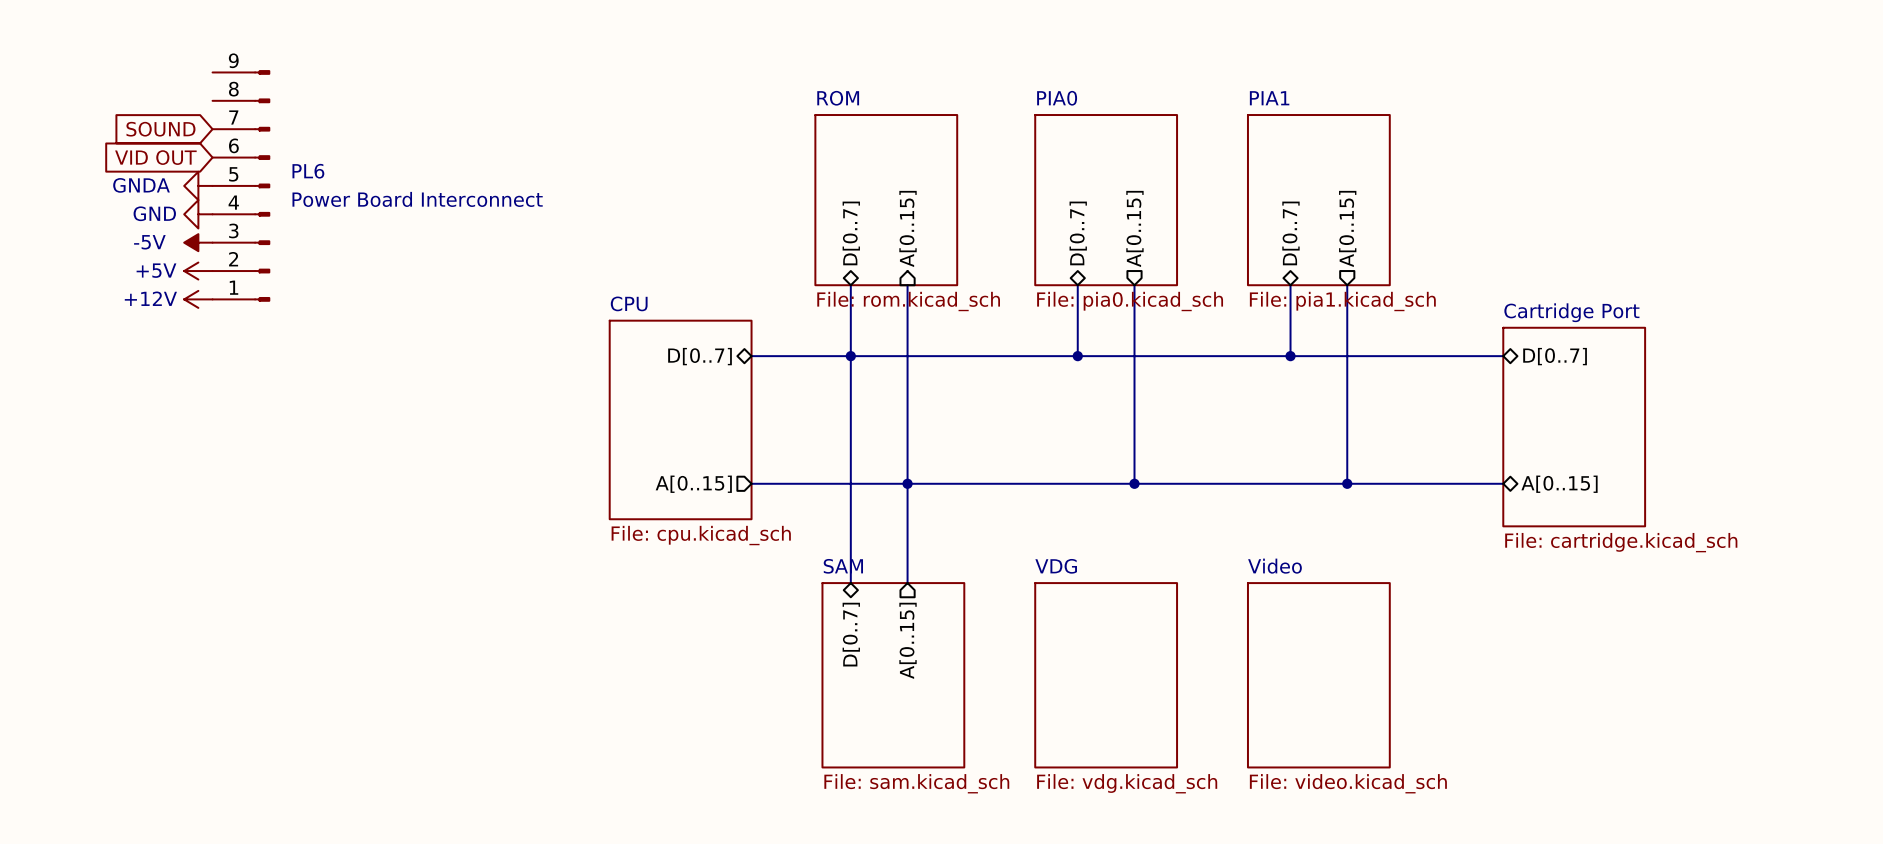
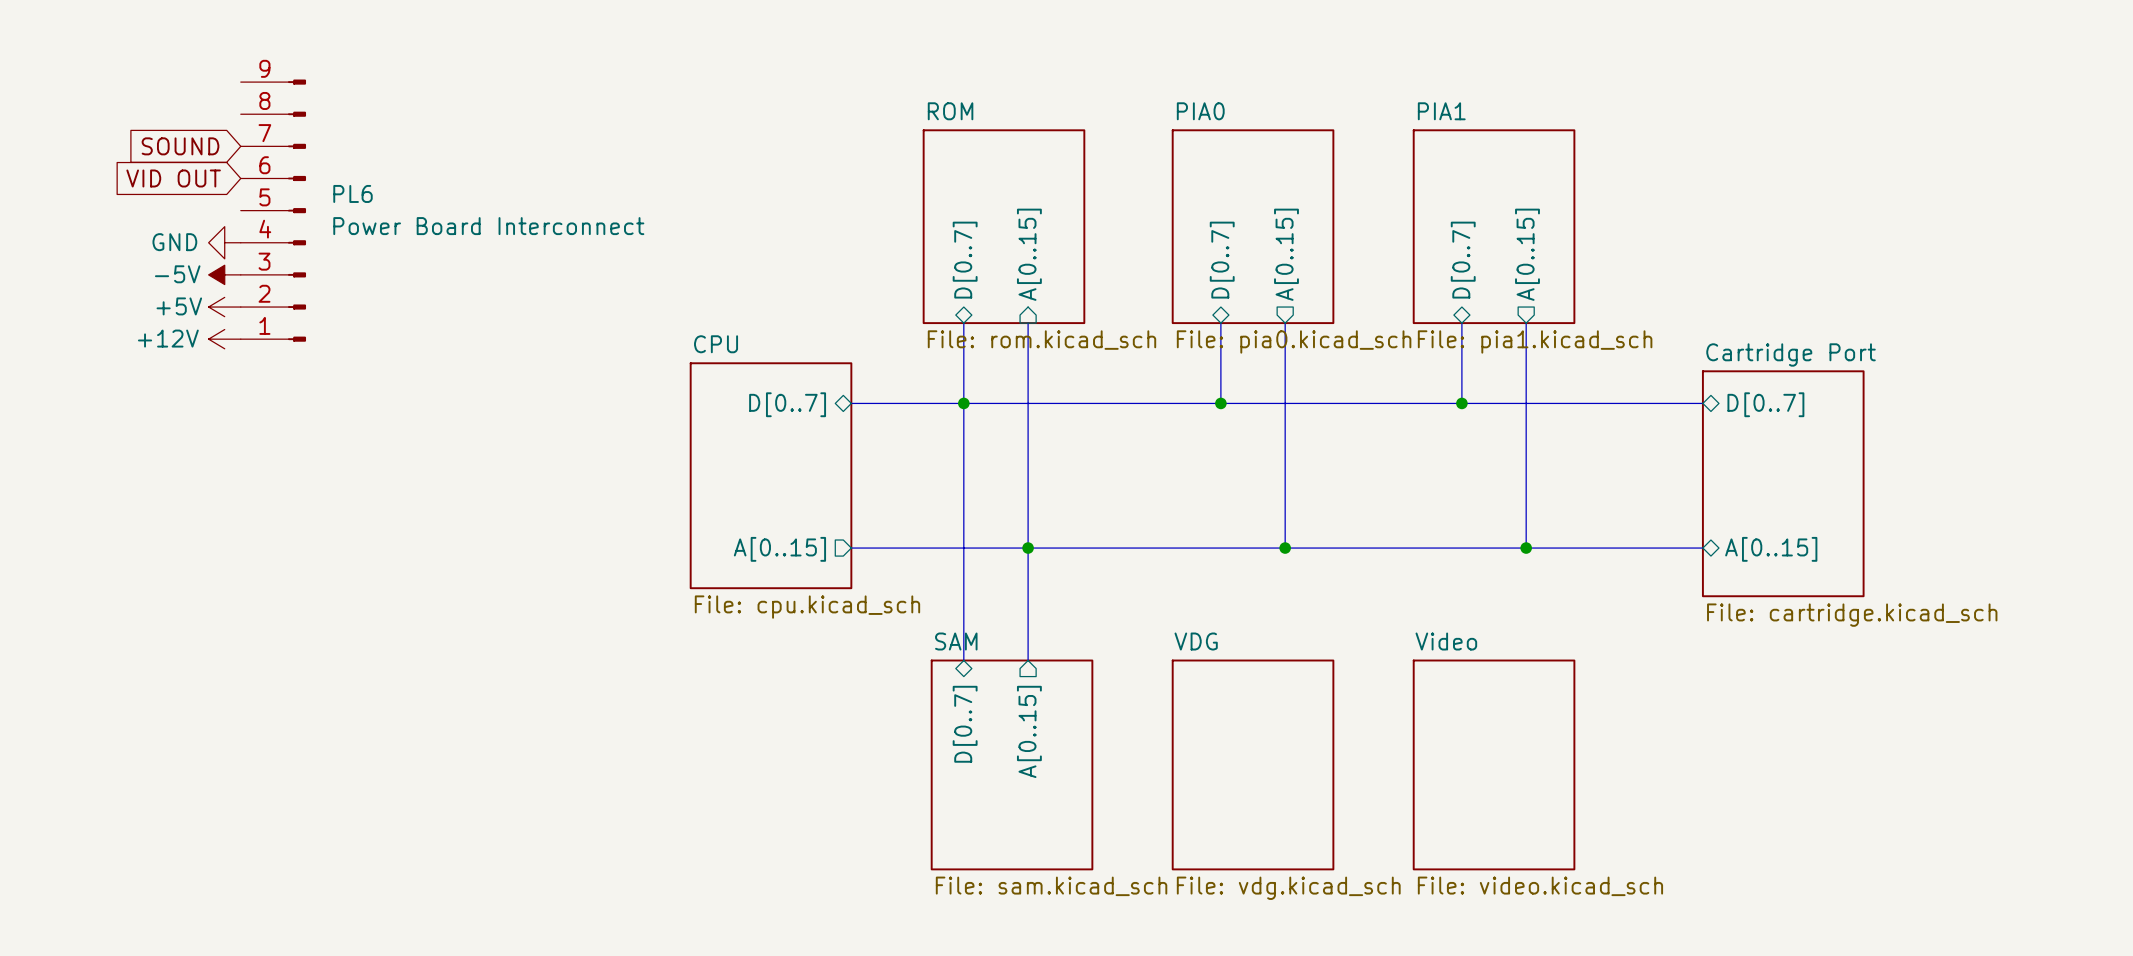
power symbol: GNDA (198, 185) -> none

